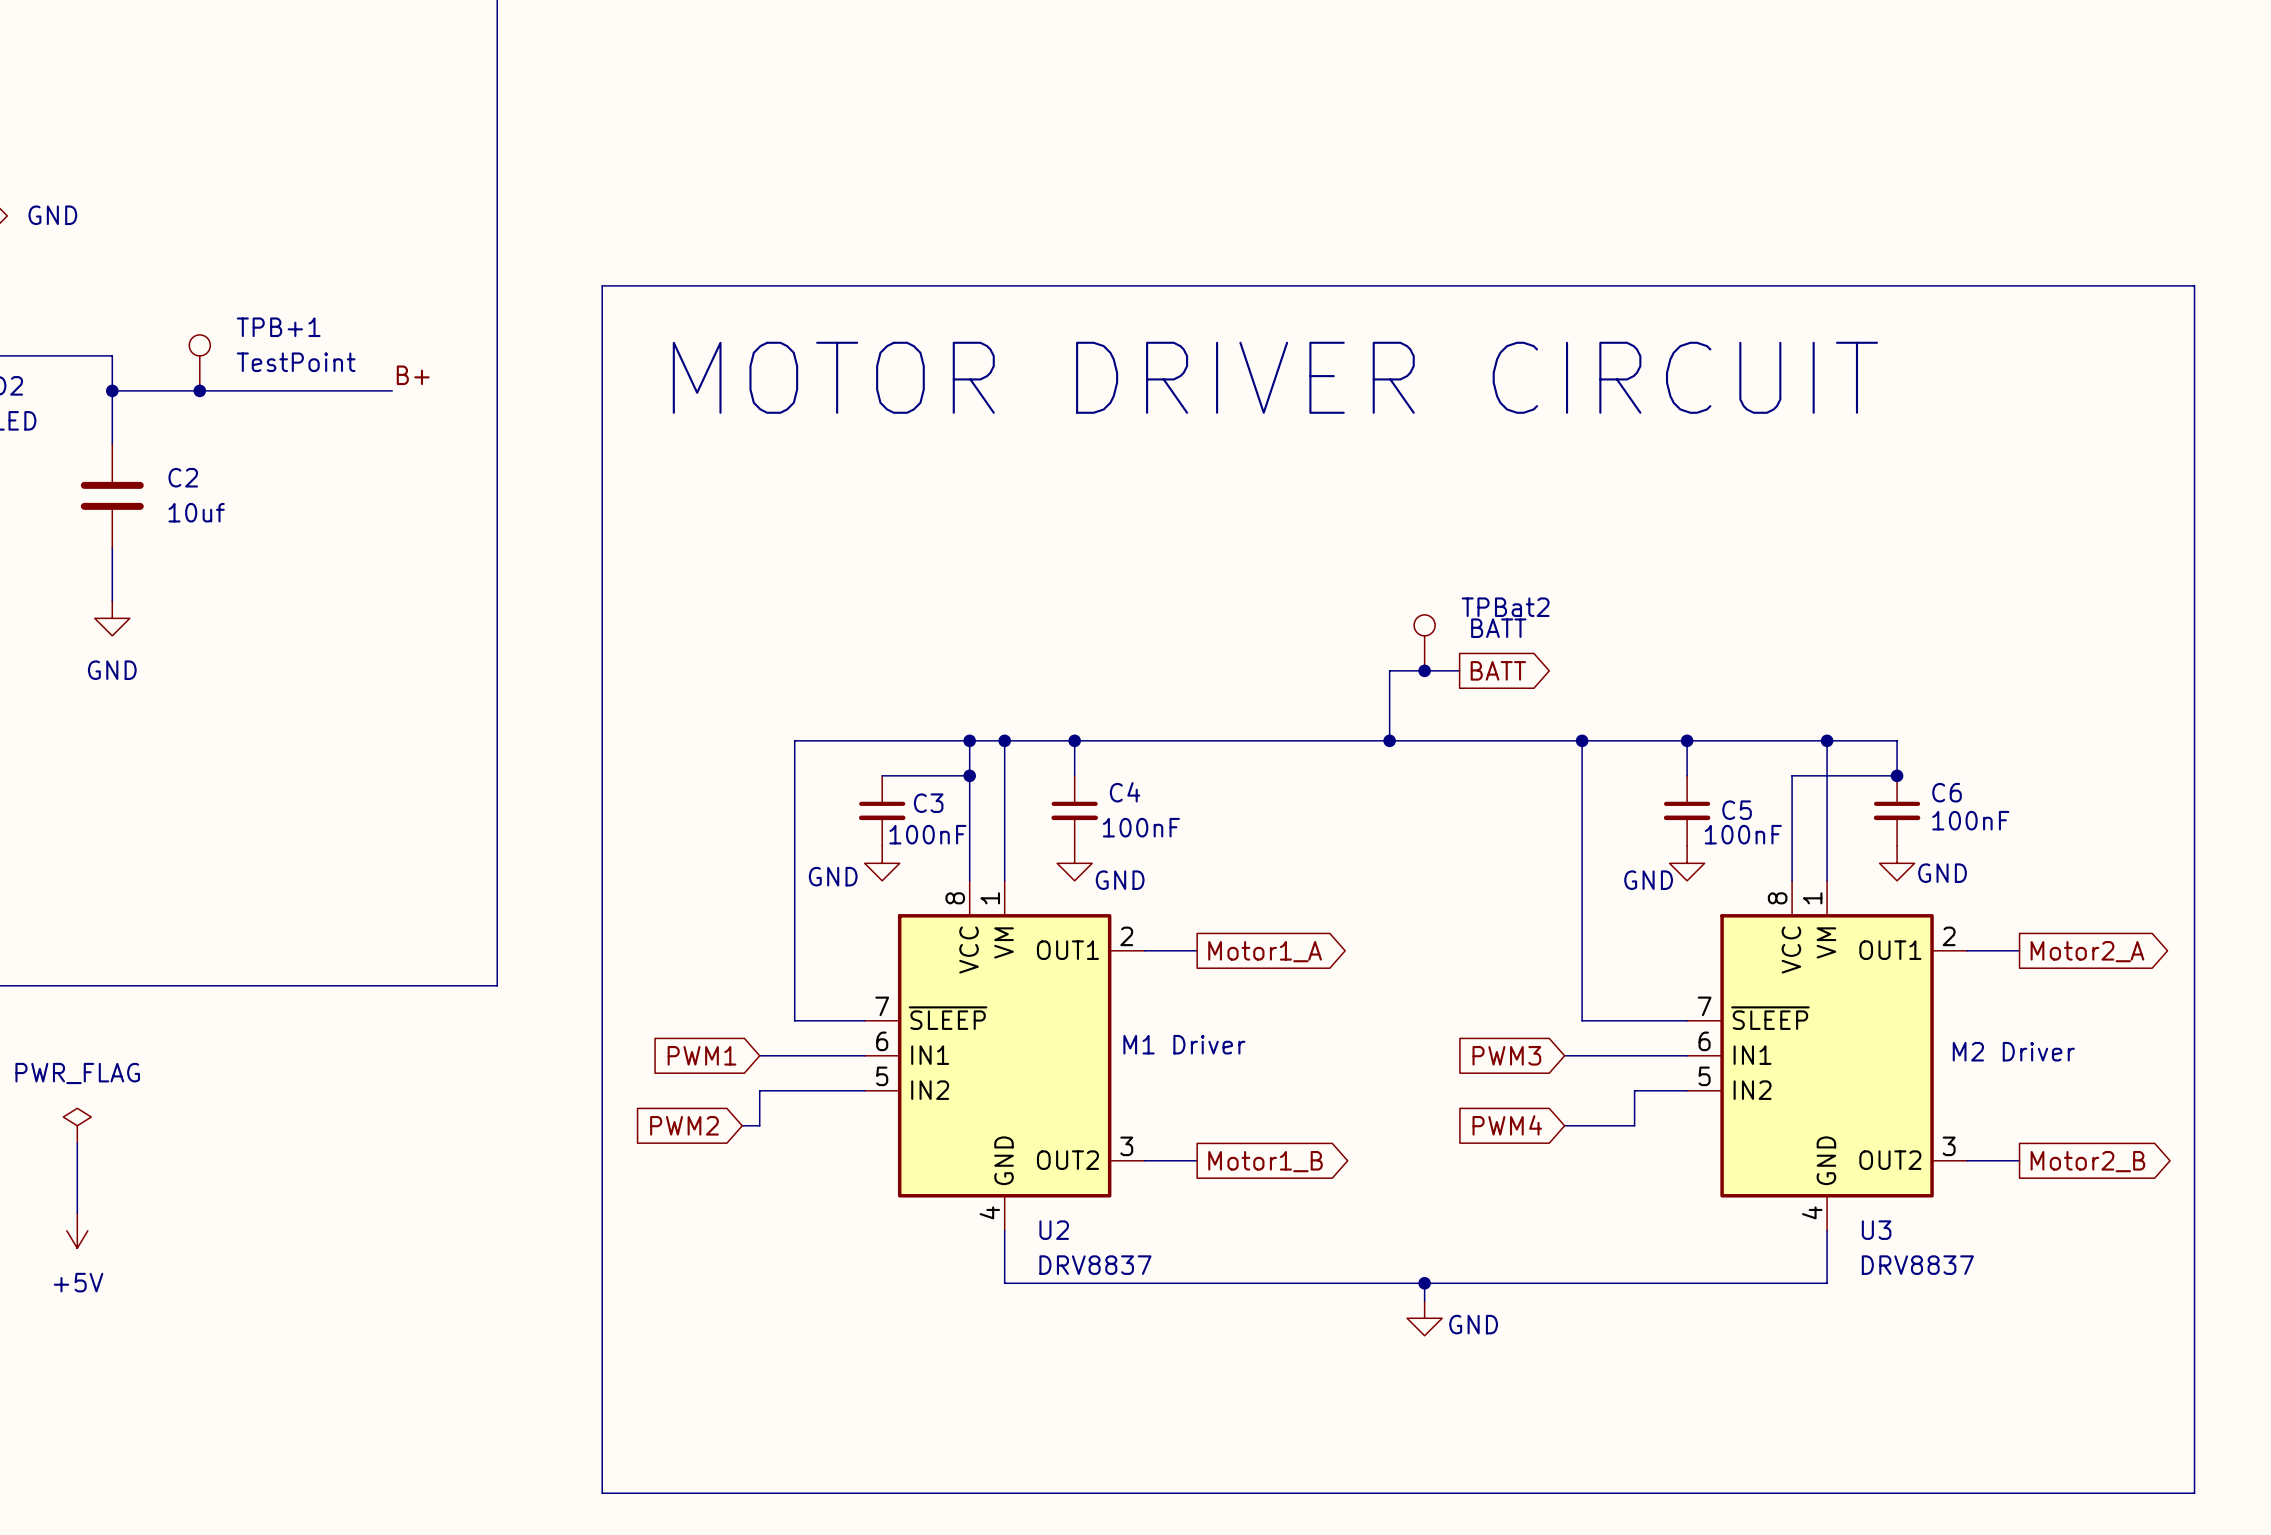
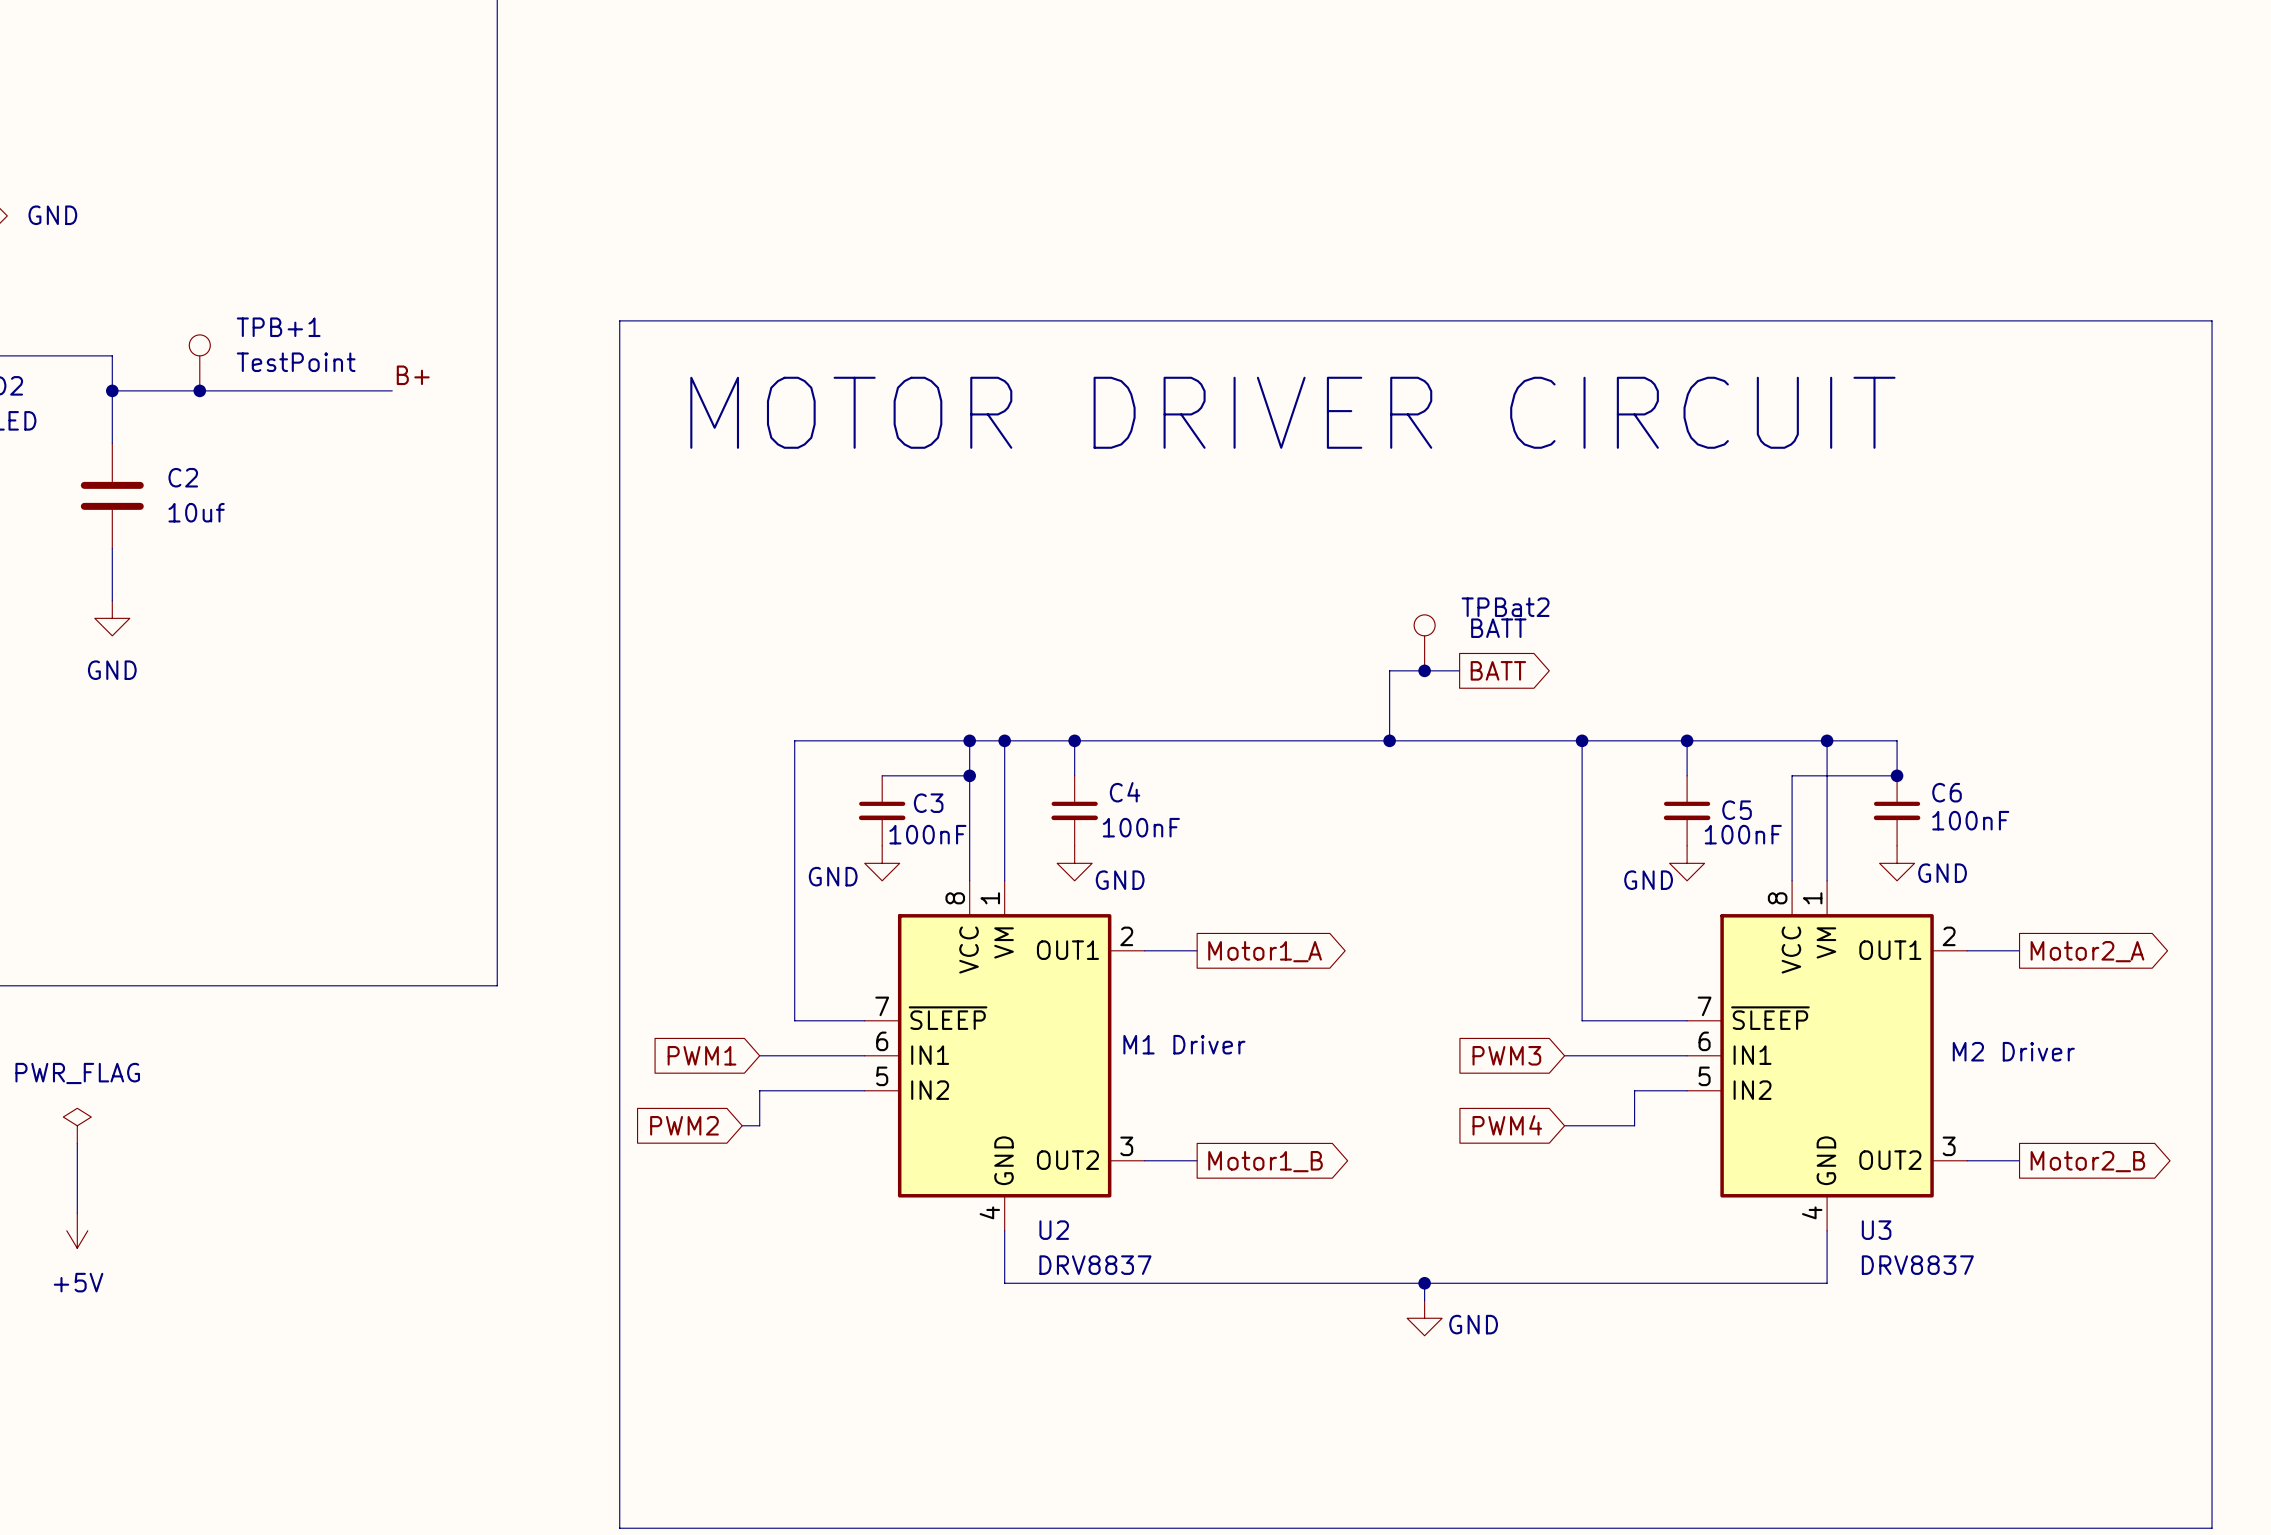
line: (602, 285) (2194, 285) (2194, 1493) (602, 1493) (602, 285) -> (619, 320) (2212, 320) (2212, 1528) (619, 1528) (619, 320)
text position: MOTOR DRIVER CIRCUIT (1275, 377) -> MOTOR DRIVER CIRCUIT (1292, 412)

